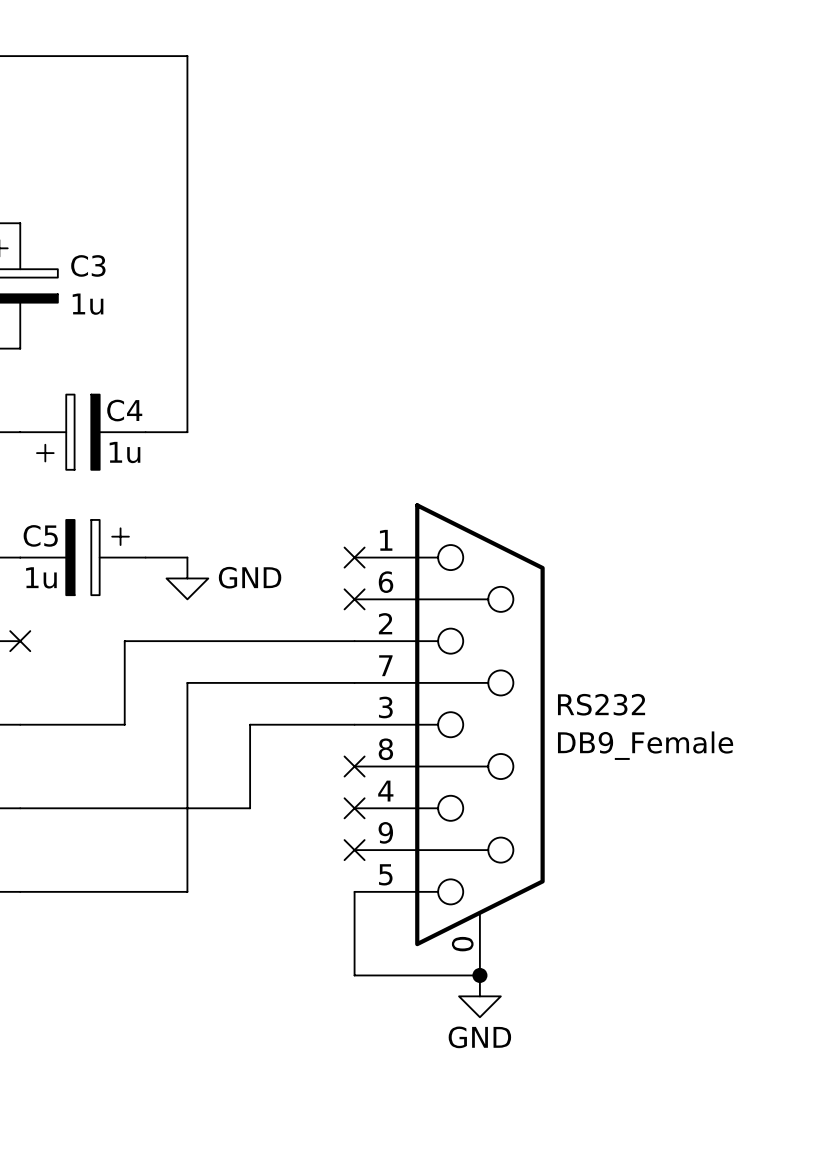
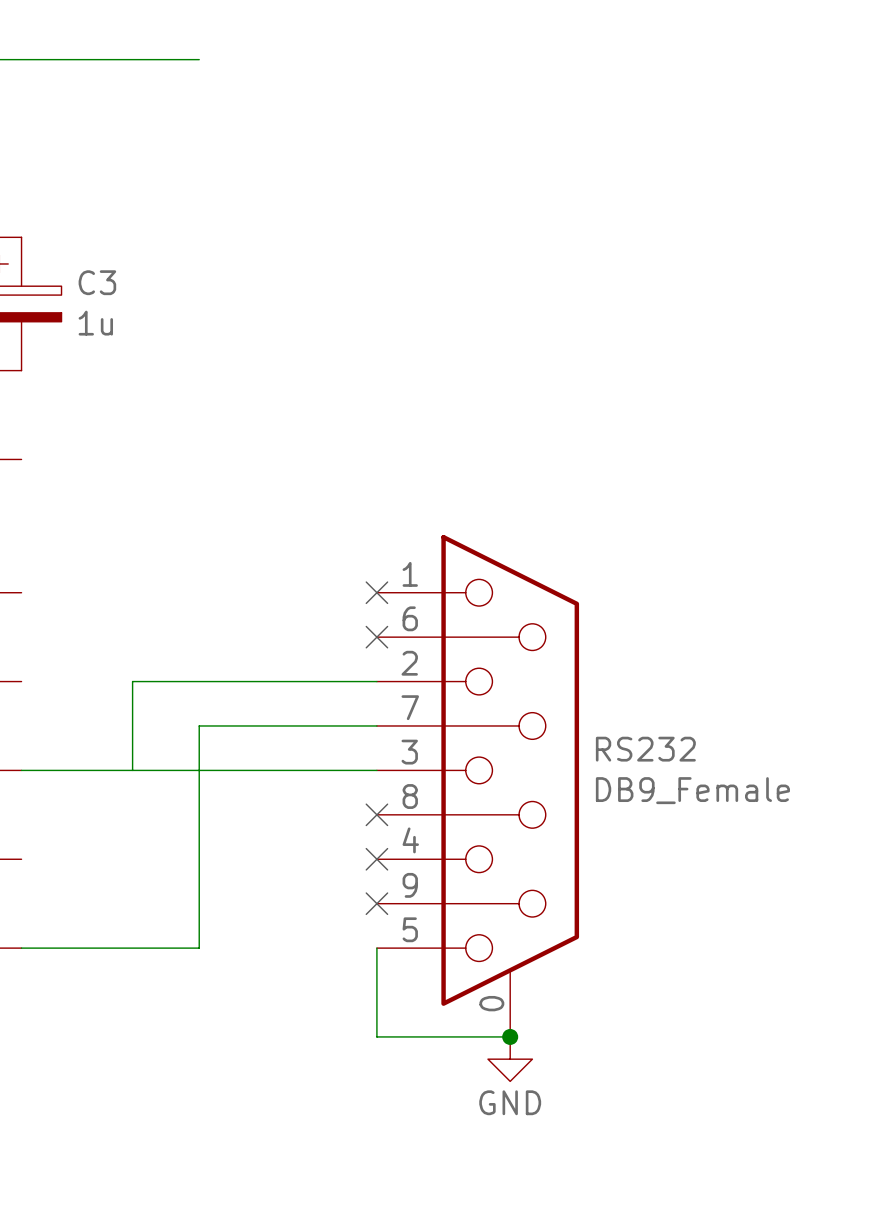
wire: (187, 56) (187, 432) (145, 432) -> none
C4: 1u (82, 432) -> none
C5: 1u (82, 557) -> none
wire: (145, 557) (187, 557) -> none
power symbol: GND (187, 578) -> none
no-connect mark: (20, 641) -> none
wire: (250, 724) (250, 808) (20, 808) -> (265, 770) (132, 770)

